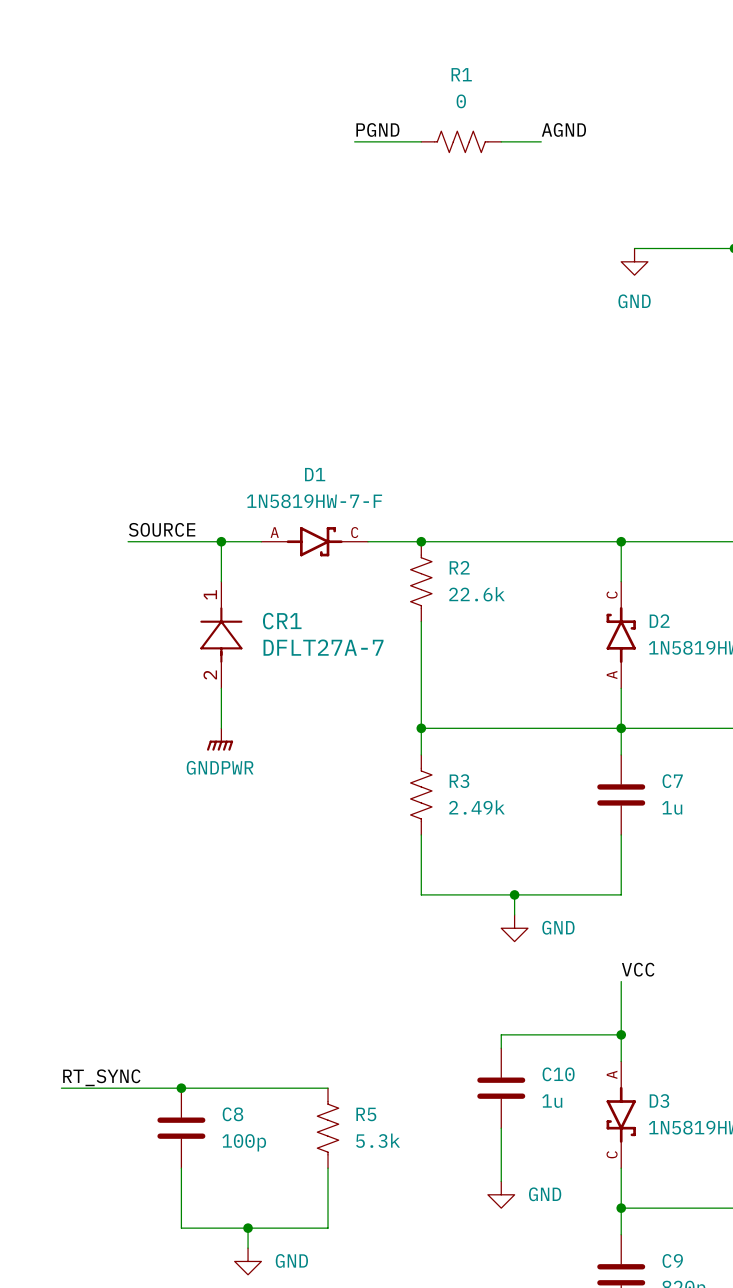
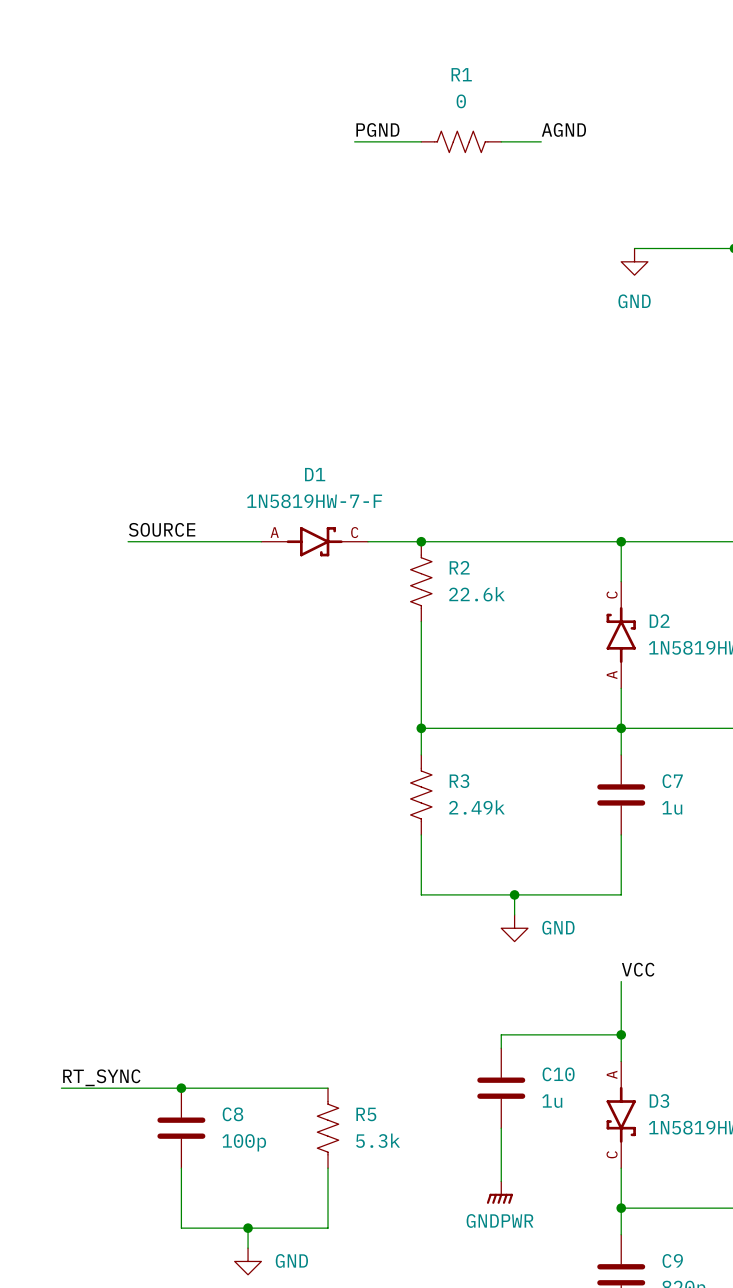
wire: (221, 541) (221, 581) -> none
junction: (221, 541) -> none
CR1: DFLT27A-7 (221, 635) -> none
wire: (221, 688) (221, 728) -> none
power symbol: GNDPWR (220, 739) -> none
power symbol: GND (501, 1194) -> GNDPWR (499, 1192)

